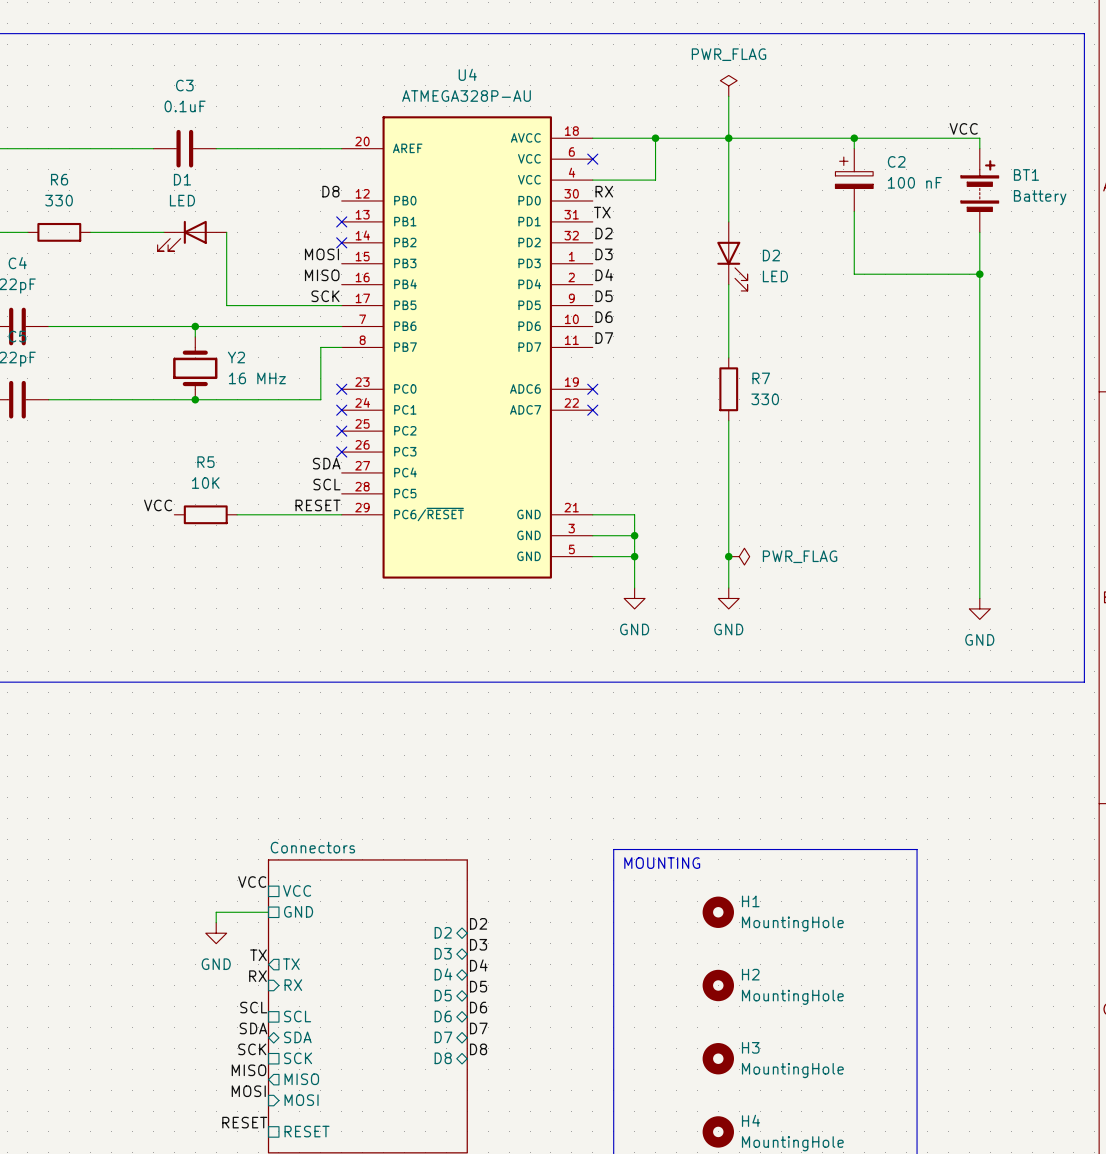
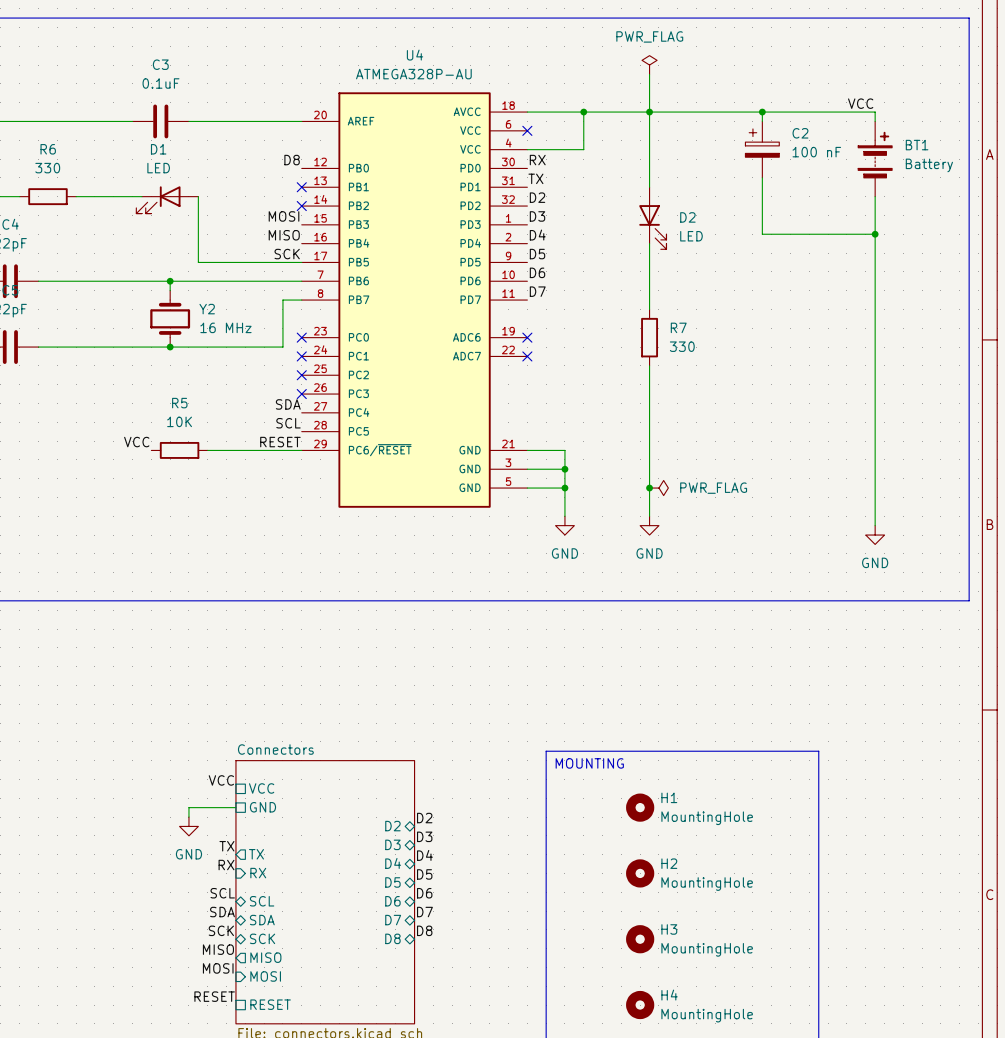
sheet pin shape: passive (297, 1016) -> bidirectional (262, 901)
sheet pin shape: passive (298, 1058) -> bidirectional (262, 938)

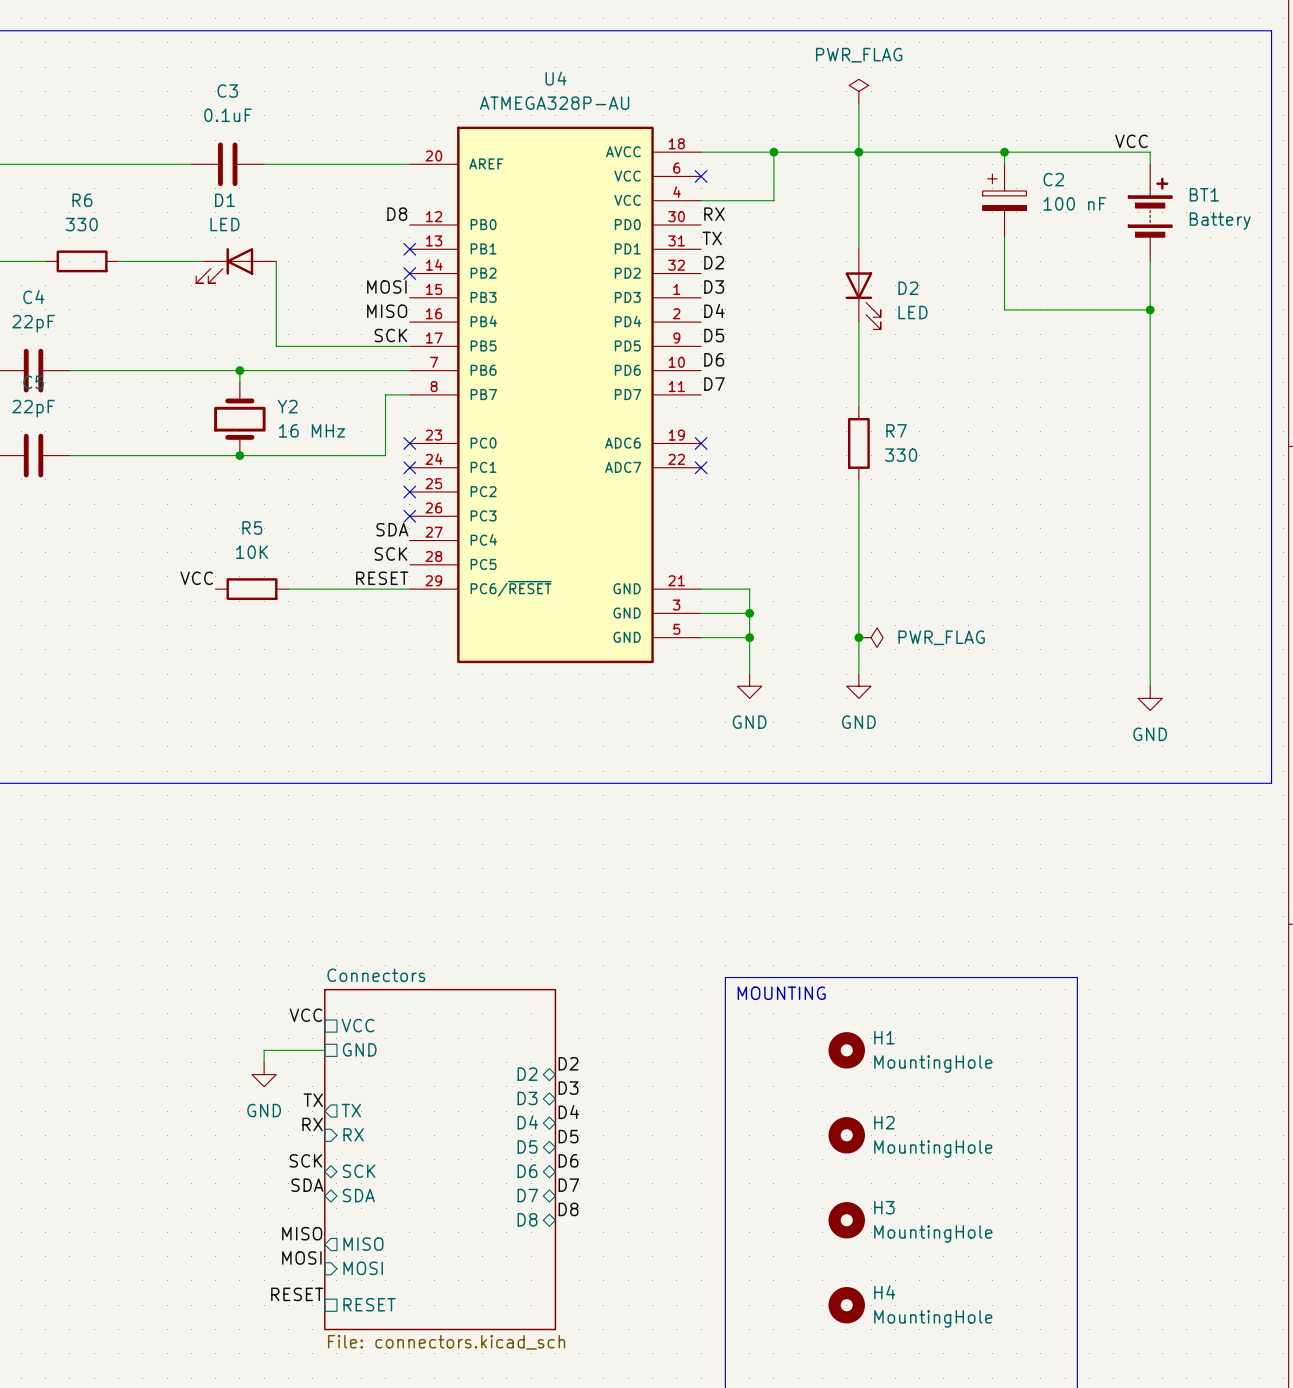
label: SCL (288, 423) -> SCK (390, 554)
label: SCL (222, 893) -> SCK (305, 1160)
sheet pin: SCL (262, 901) -> SCK (359, 1171)
label: SCK (221, 930) -> none
sheet pin: SCK (262, 938) -> none

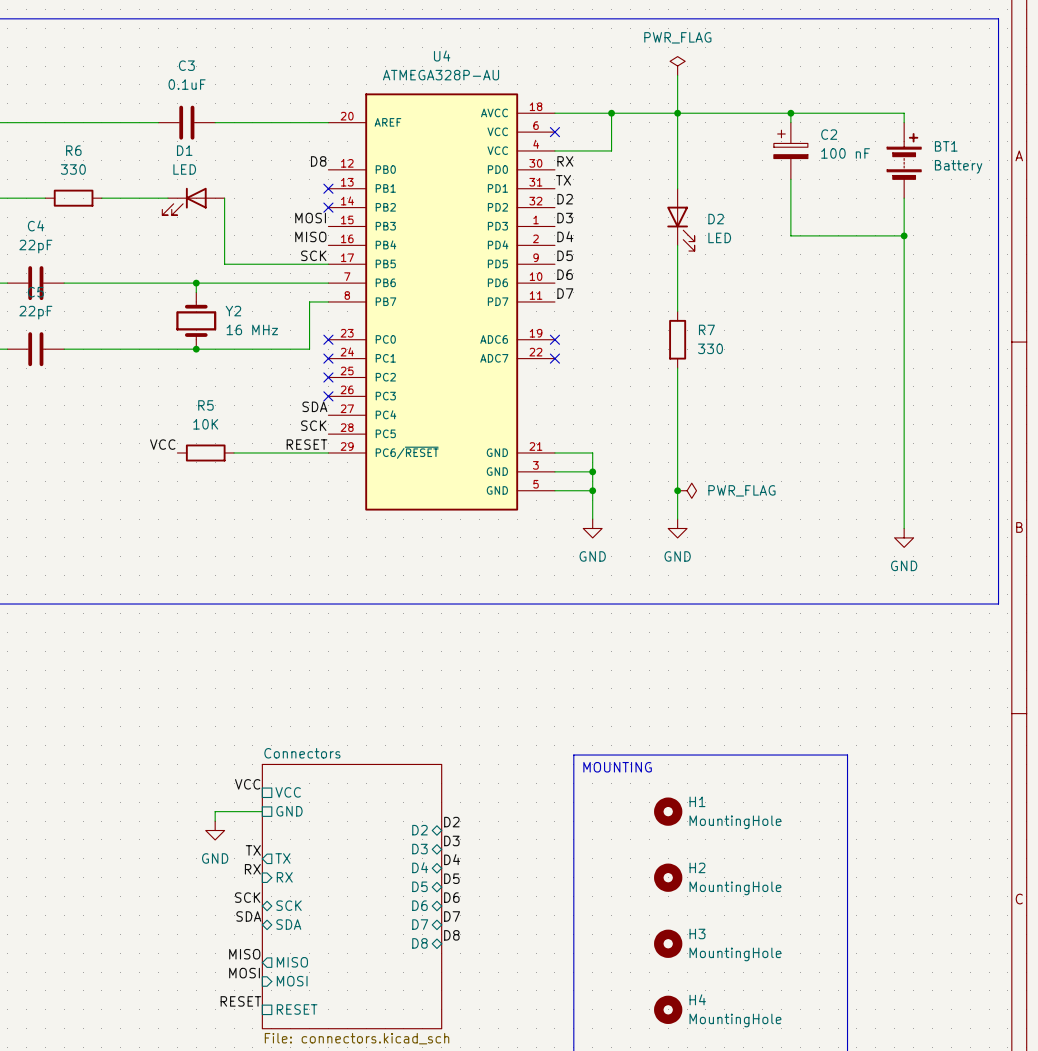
label: VCC (1131, 141) -> none

